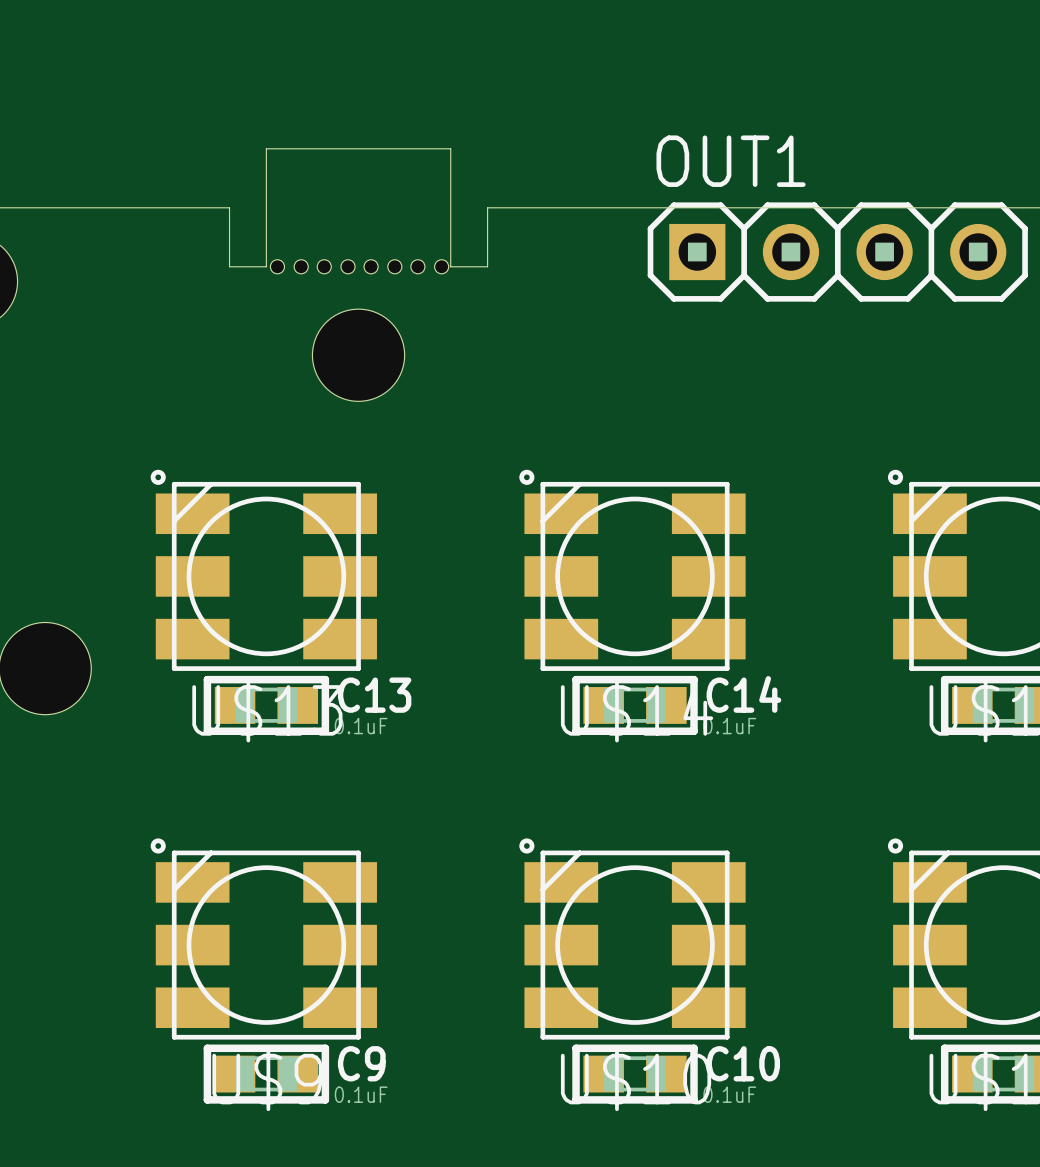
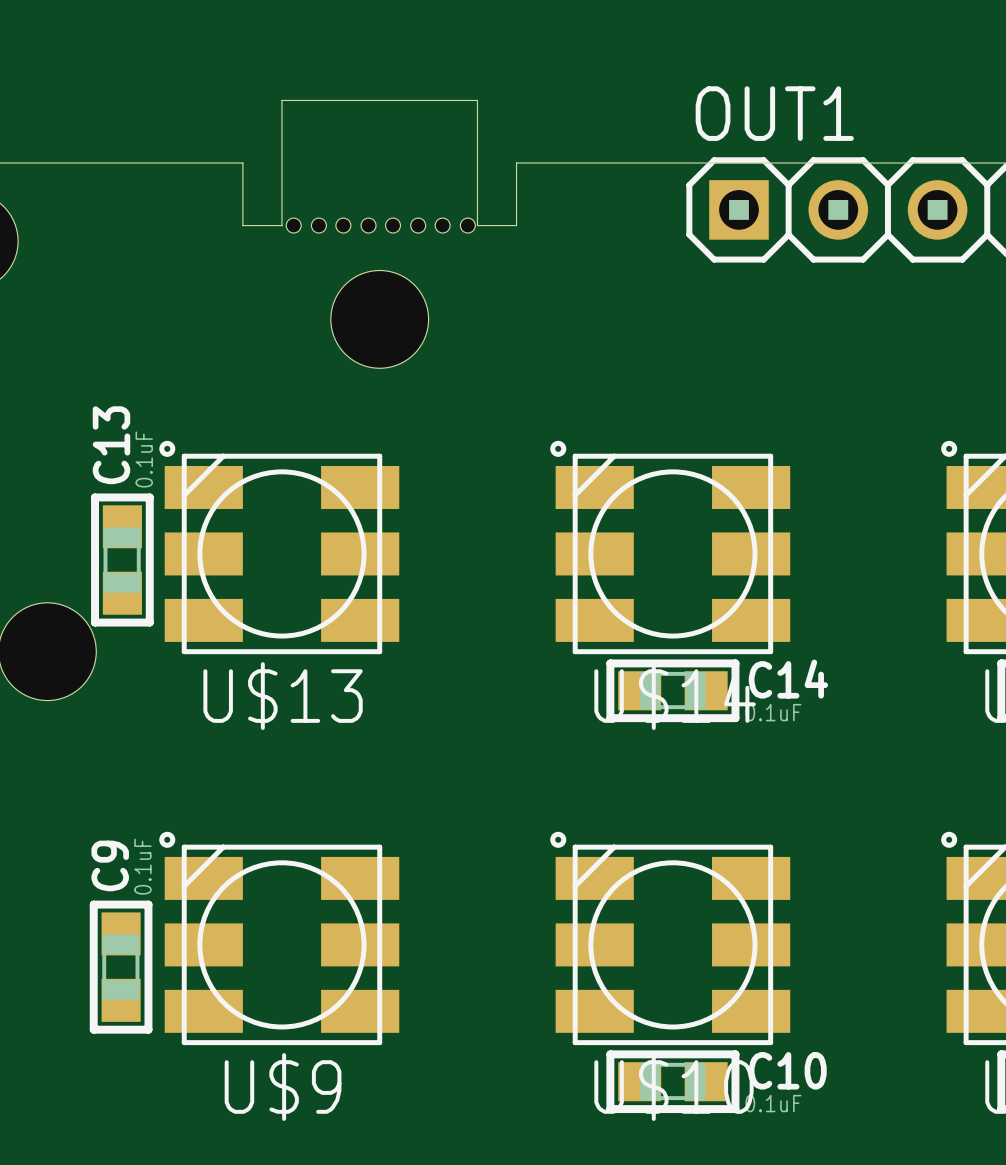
C13 name position: C13 (374, 695) -> C13 (111, 445)
C13 rotation: 0° (266, 705) -> 90° clockwise (122, 560)
C13 position: (266, 705) -> (122, 560)
C13 value position: 0.1uF (361, 726) -> 0.1uF (144, 459)
C9 name position: C9 (361, 1063) -> C9 (110, 865)
C9 rotation: 0° (266, 1074) -> 90° clockwise (121, 967)
C9 position: (266, 1074) -> (121, 967)
C9 value position: 0.1uF (361, 1094) -> 0.1uF (142, 866)

